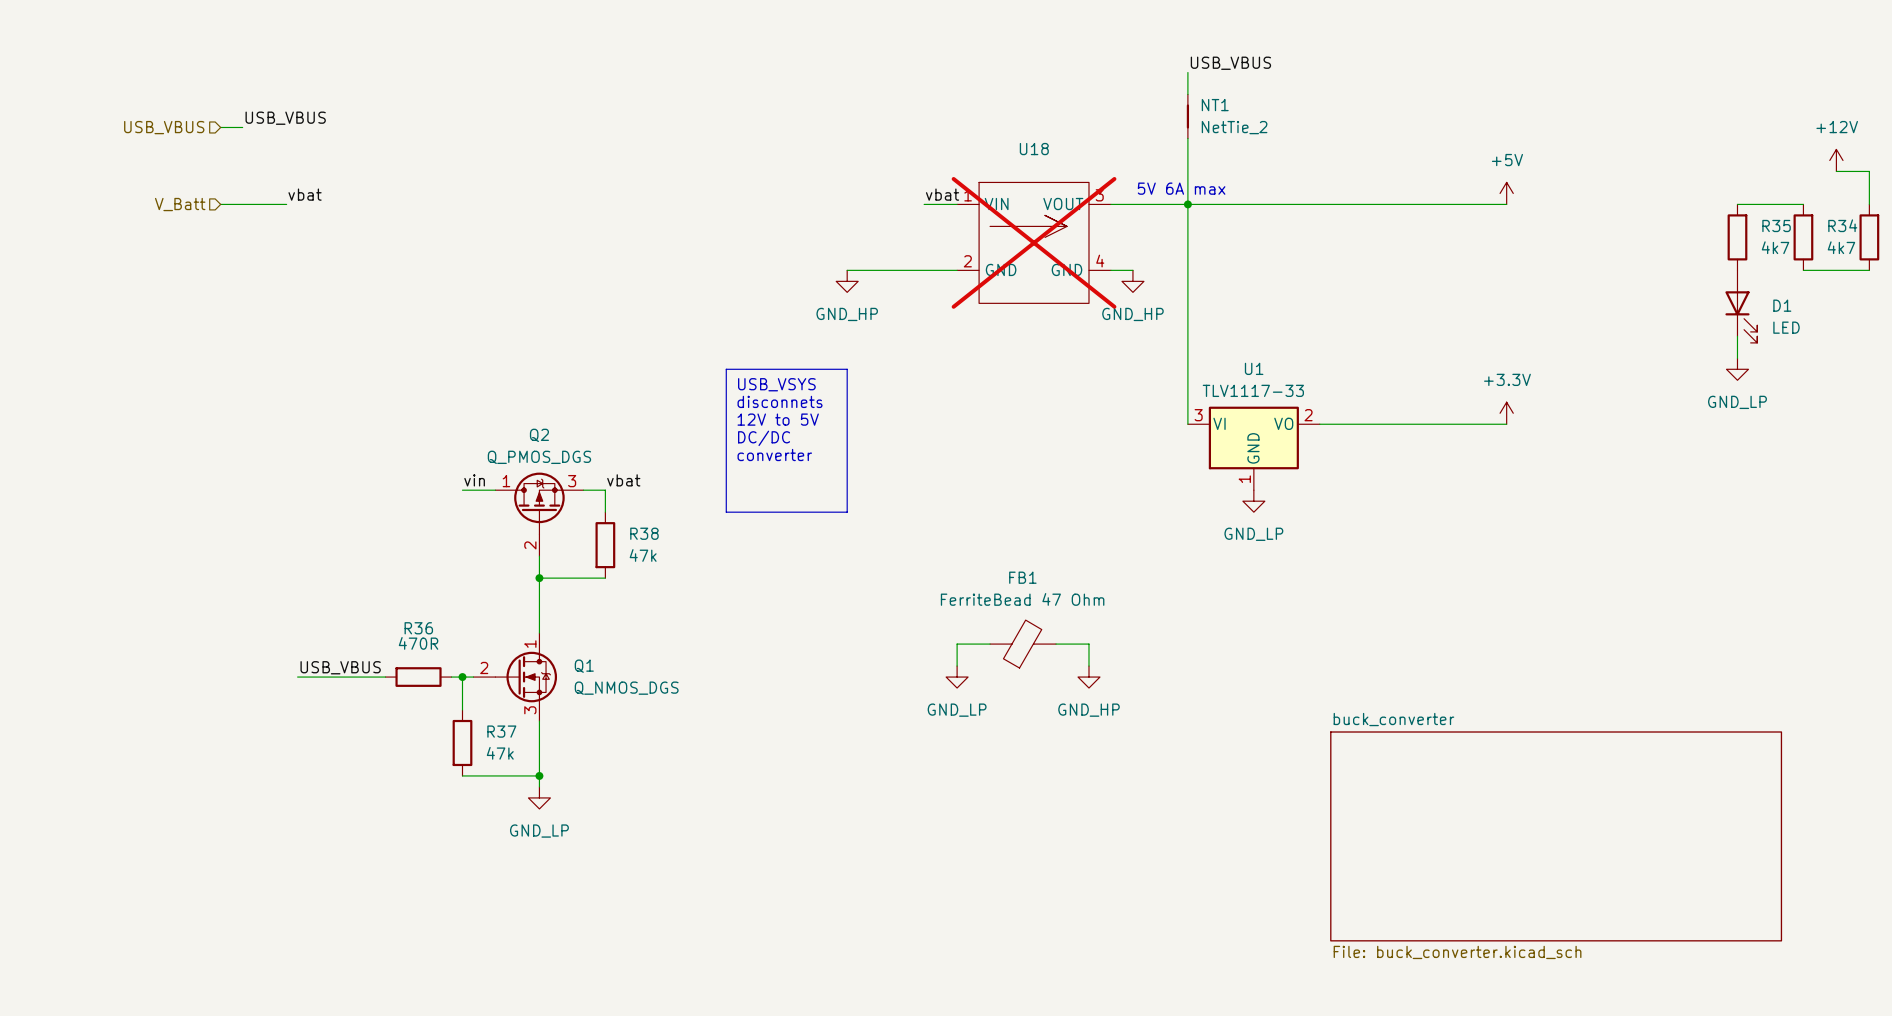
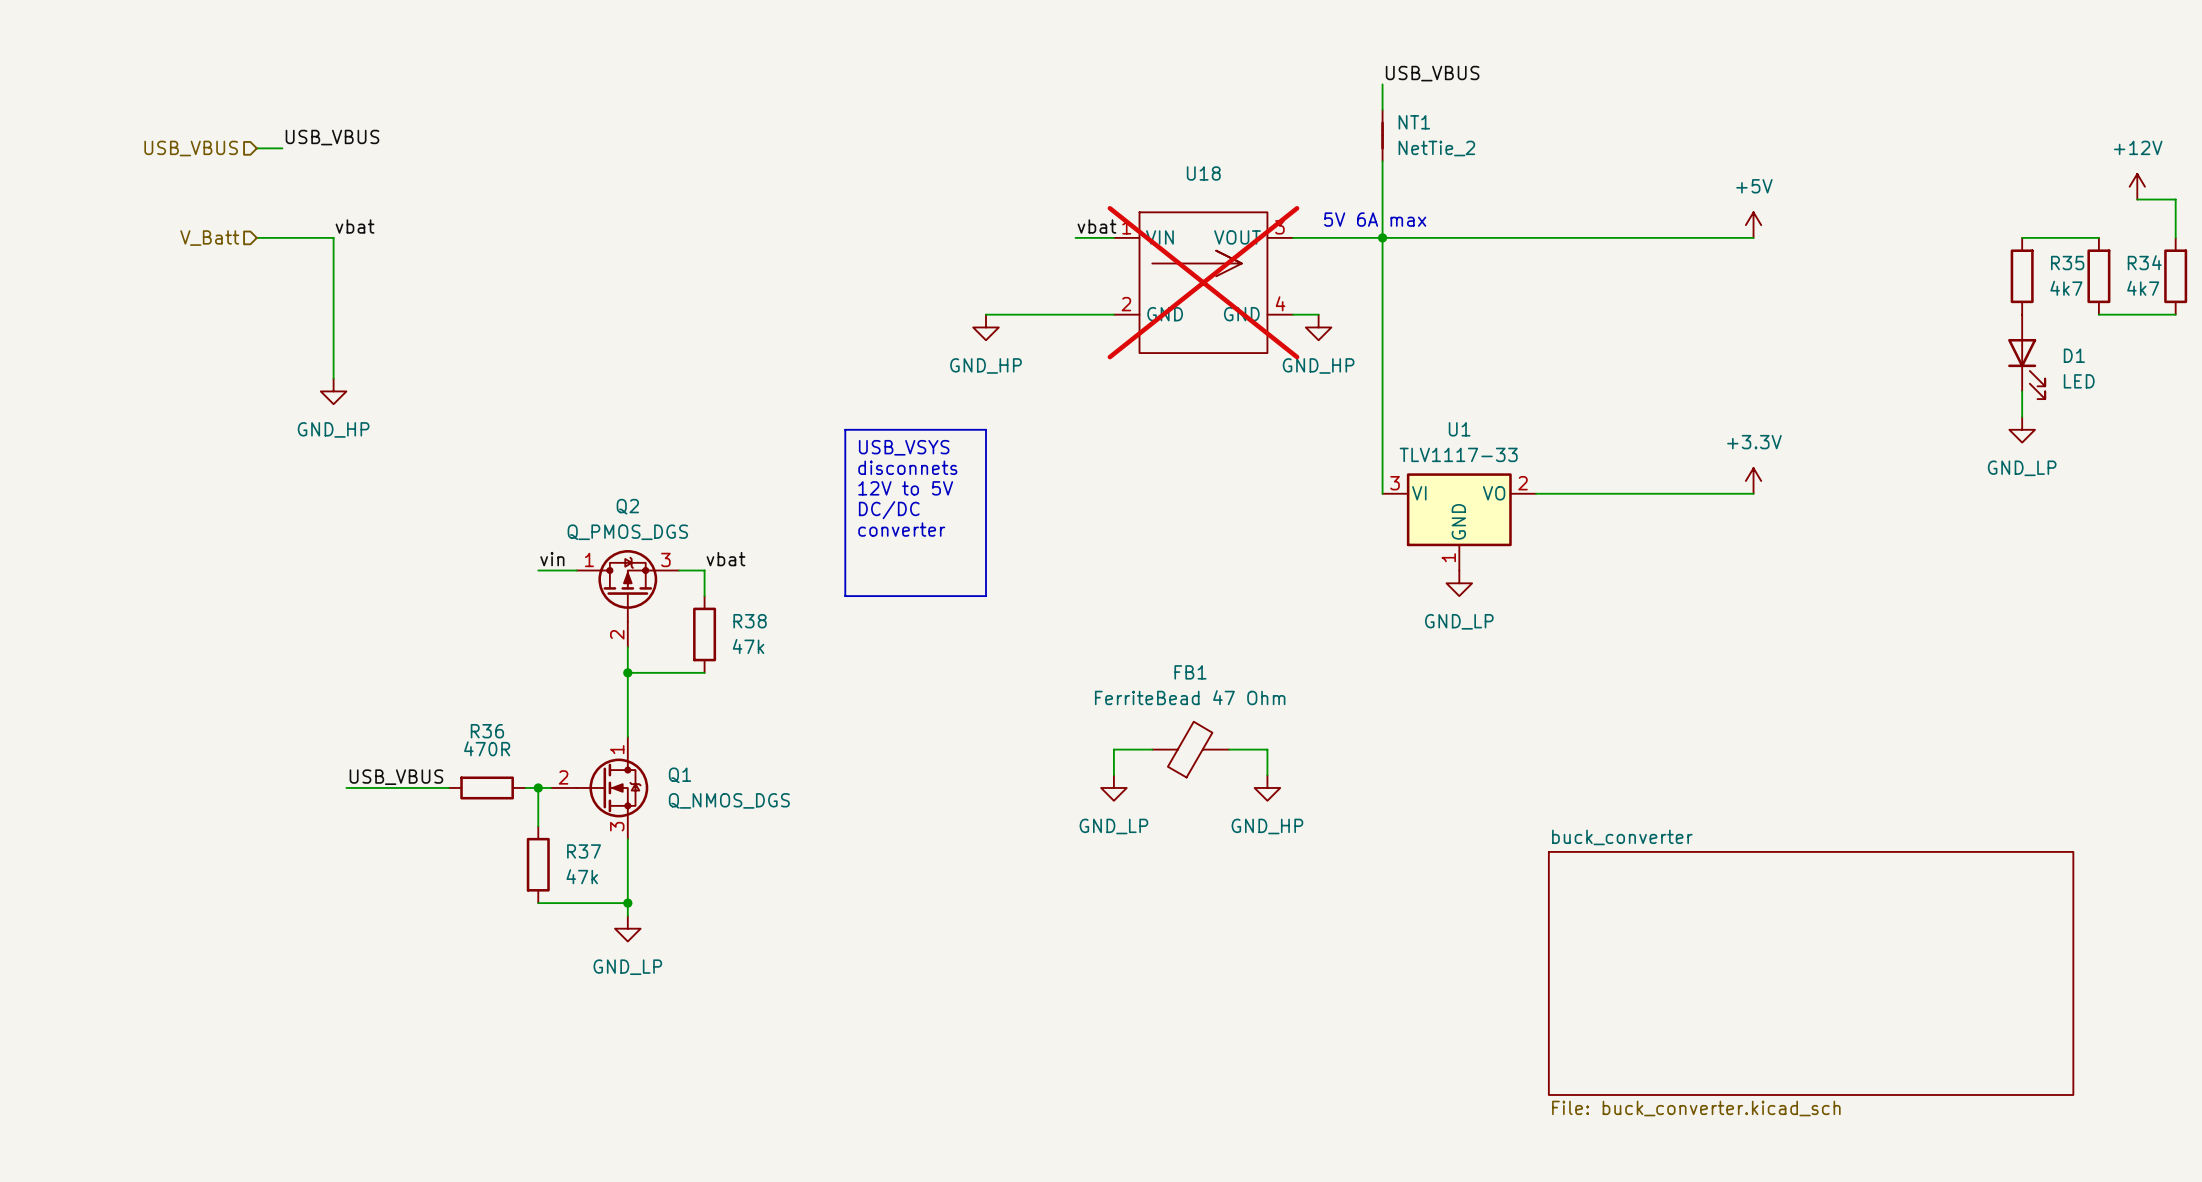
wire: none -> (333, 237) (333, 378)
power symbol: none -> GND_HP (333, 391)

